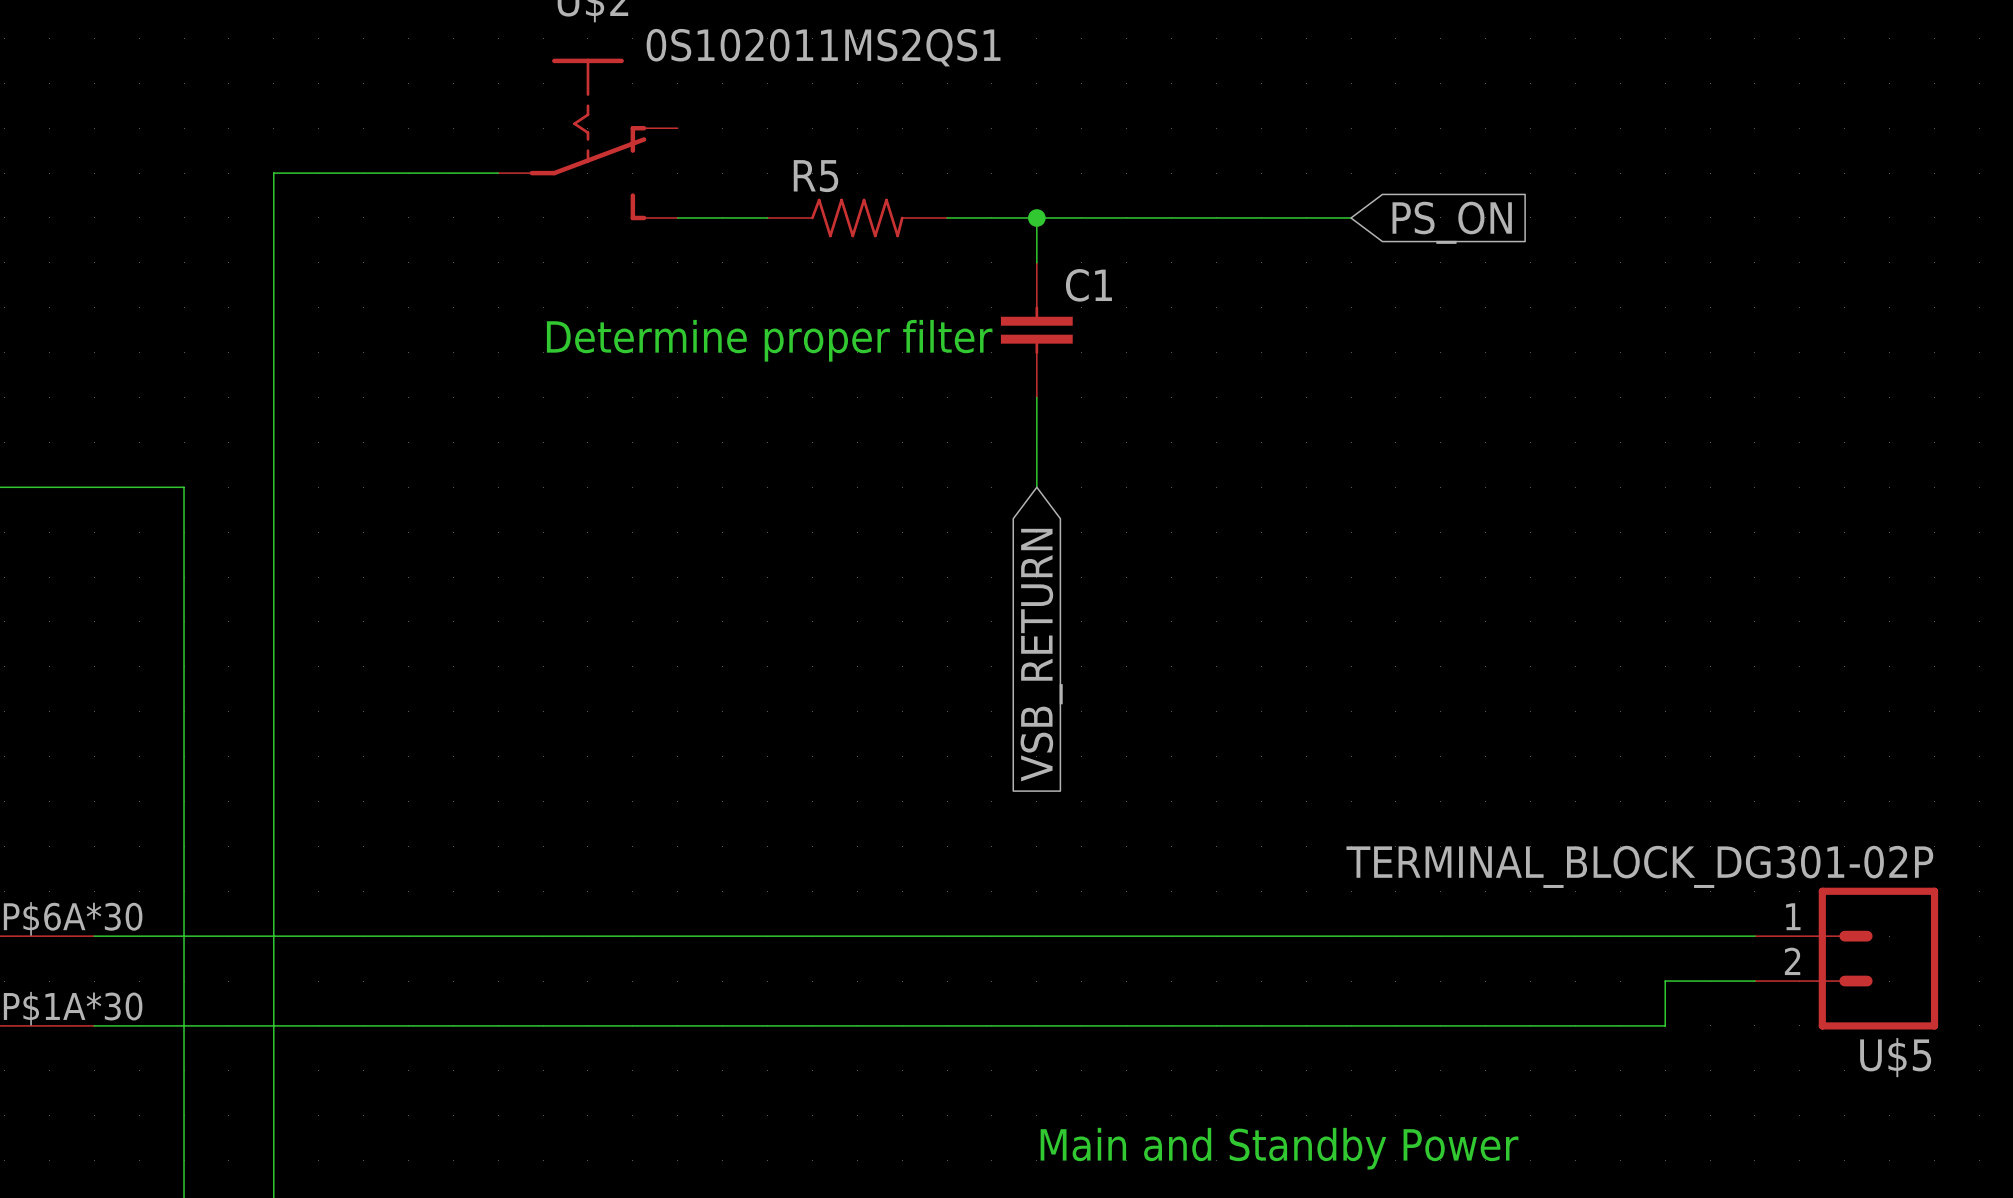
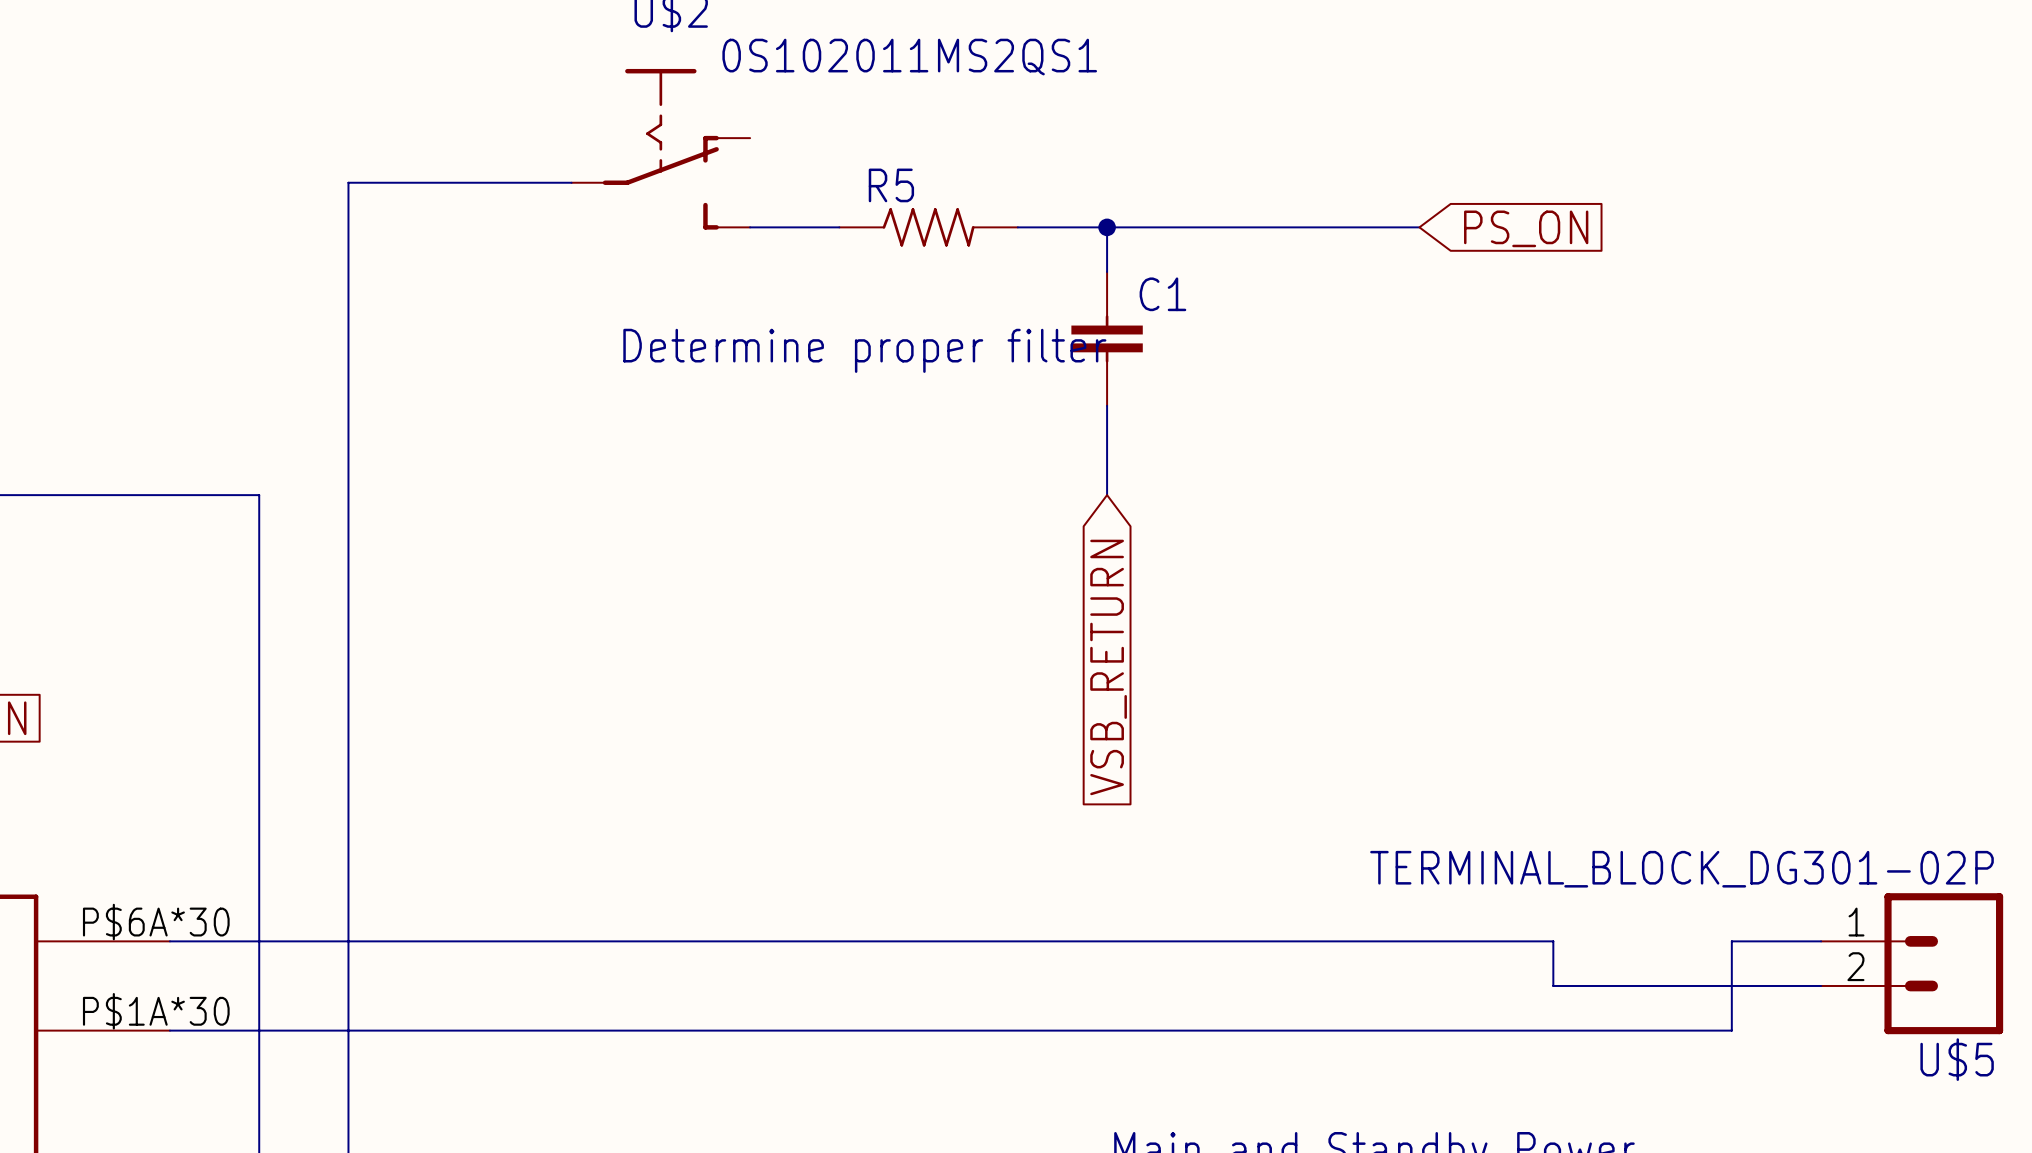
wire: (1485, 936) (1665, 936) -> (1553, 941) (1553, 985) (1731, 985) (1731, 941)

